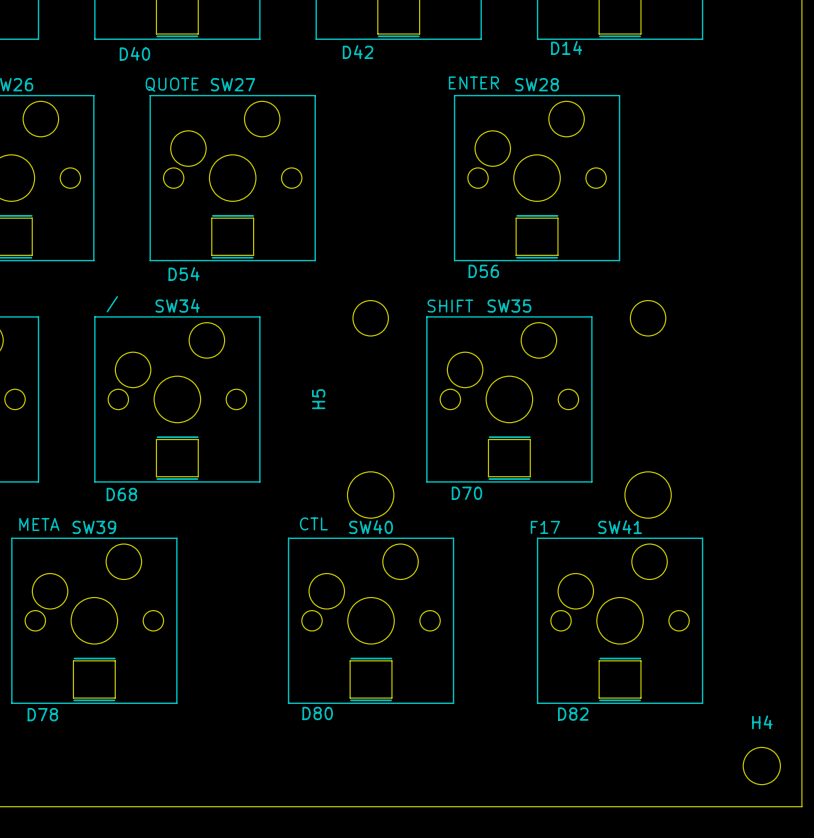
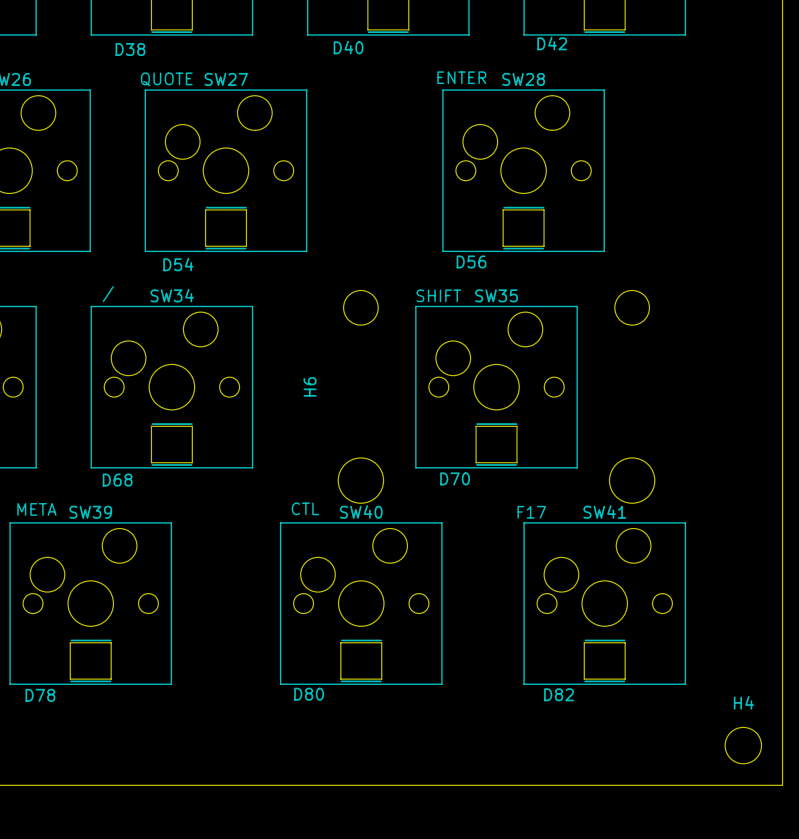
D14 name: D14 (566, 48) -> D42 (552, 43)
D42 name: D42 (358, 52) -> D40 (348, 47)
D40 name: D40 (134, 53) -> D38 (130, 49)
H5 name: H5 (318, 399) -> H6 (310, 386)

